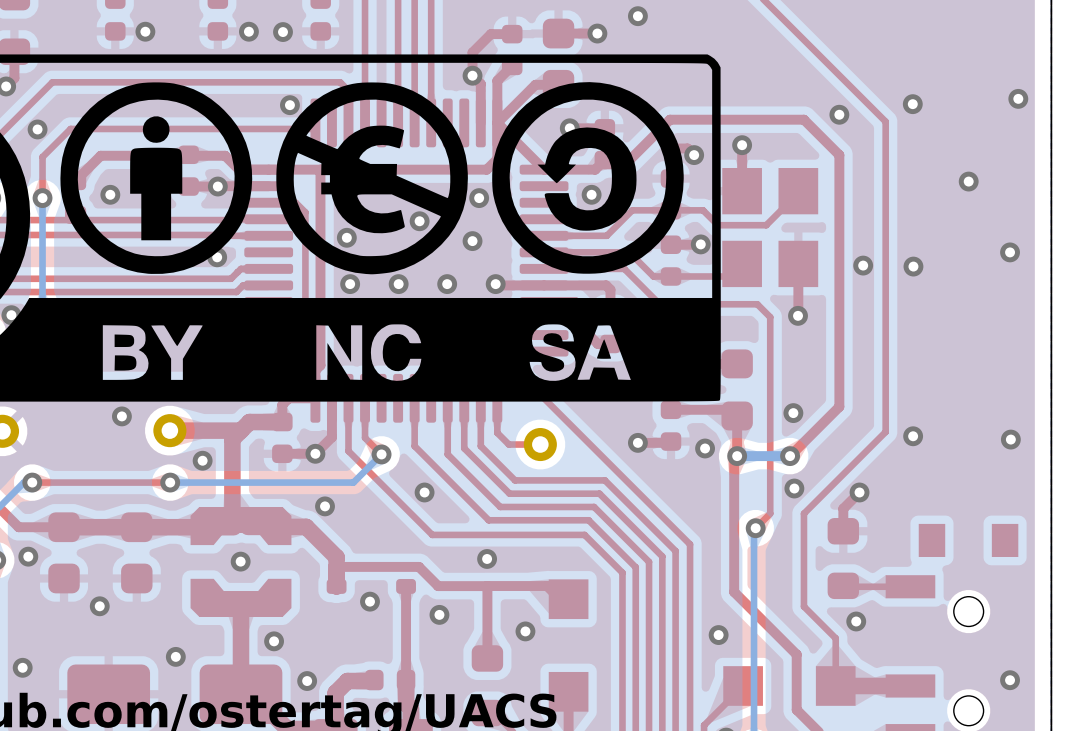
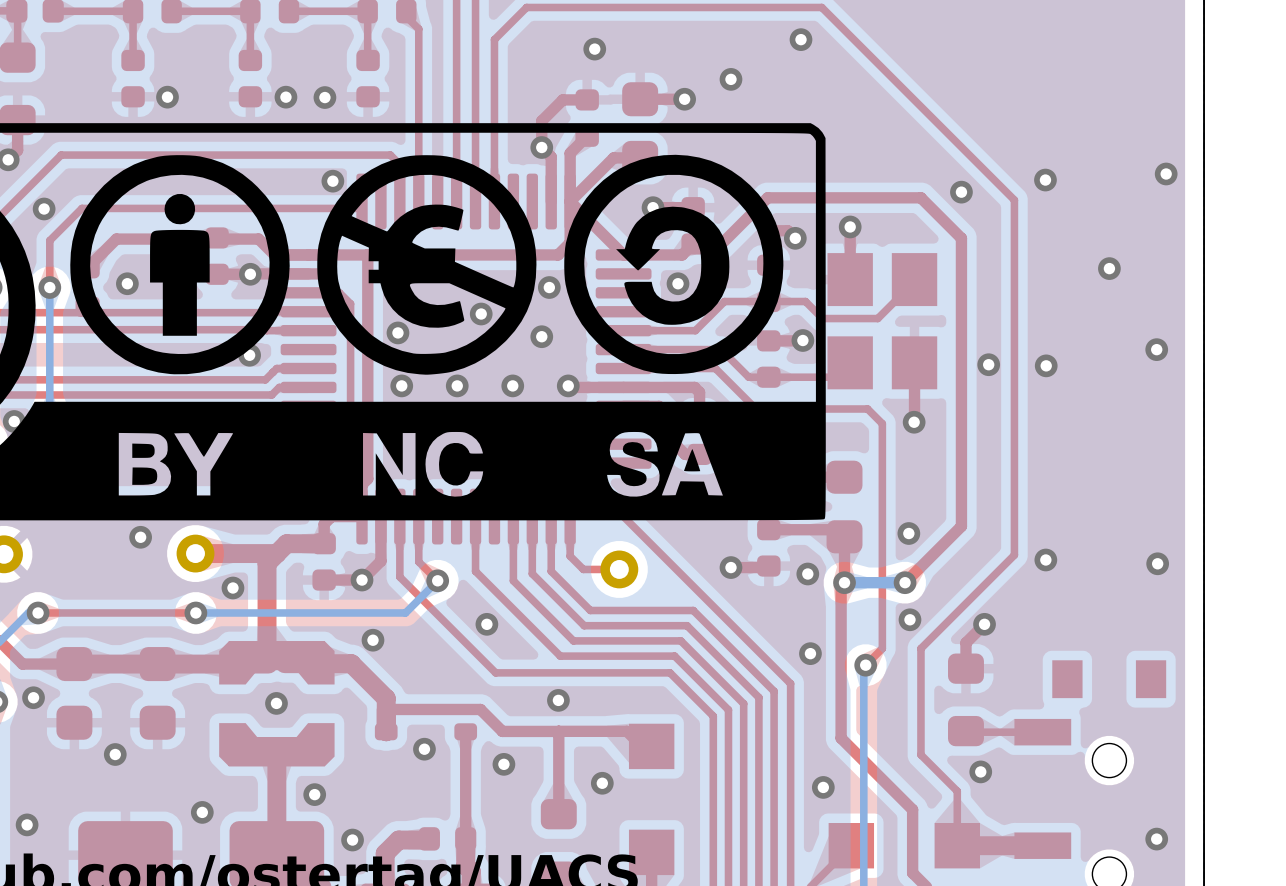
via: none -> (810, 653)

